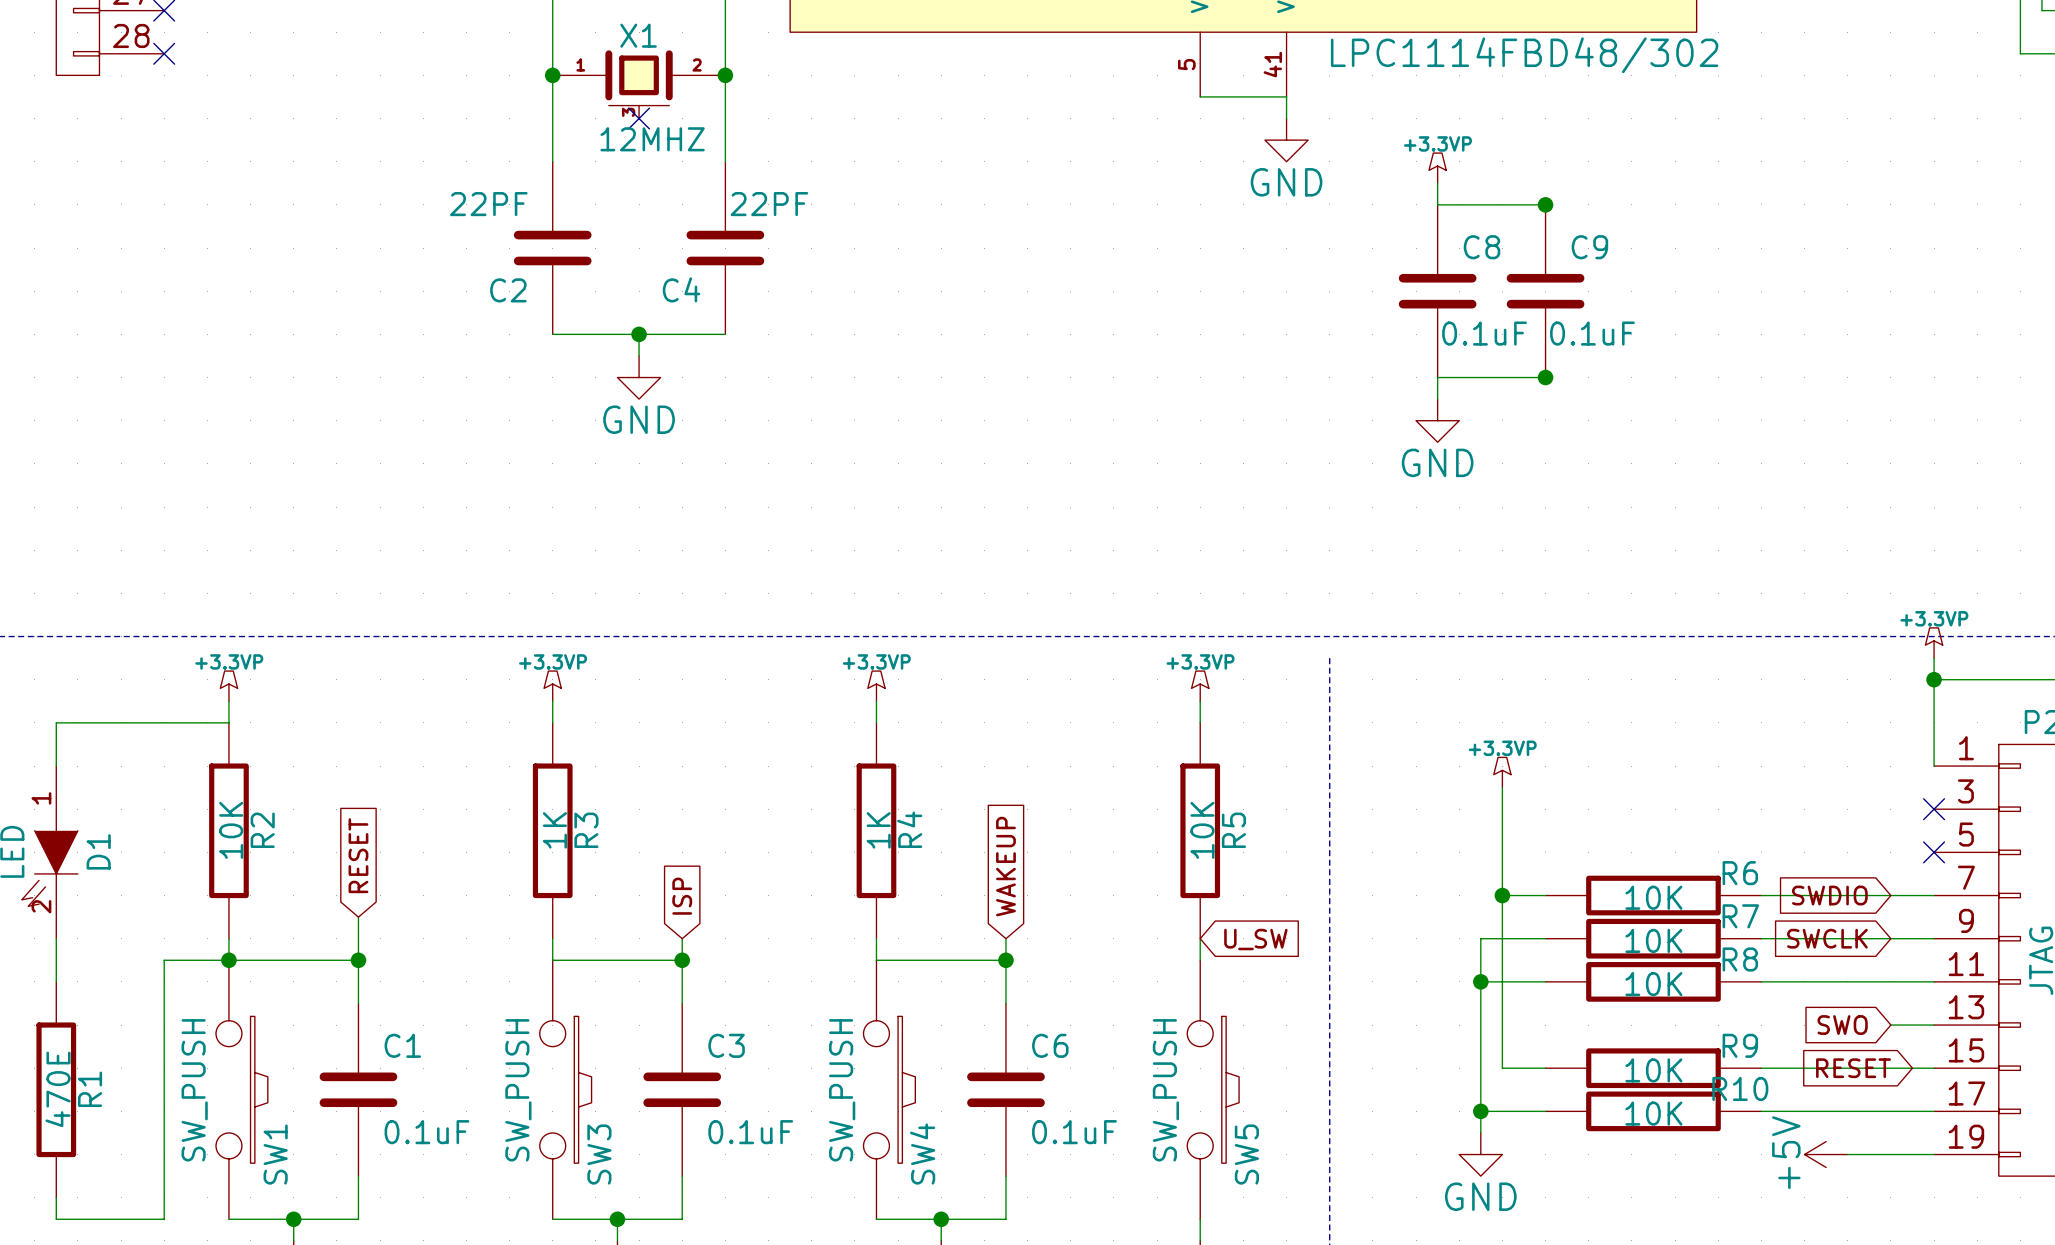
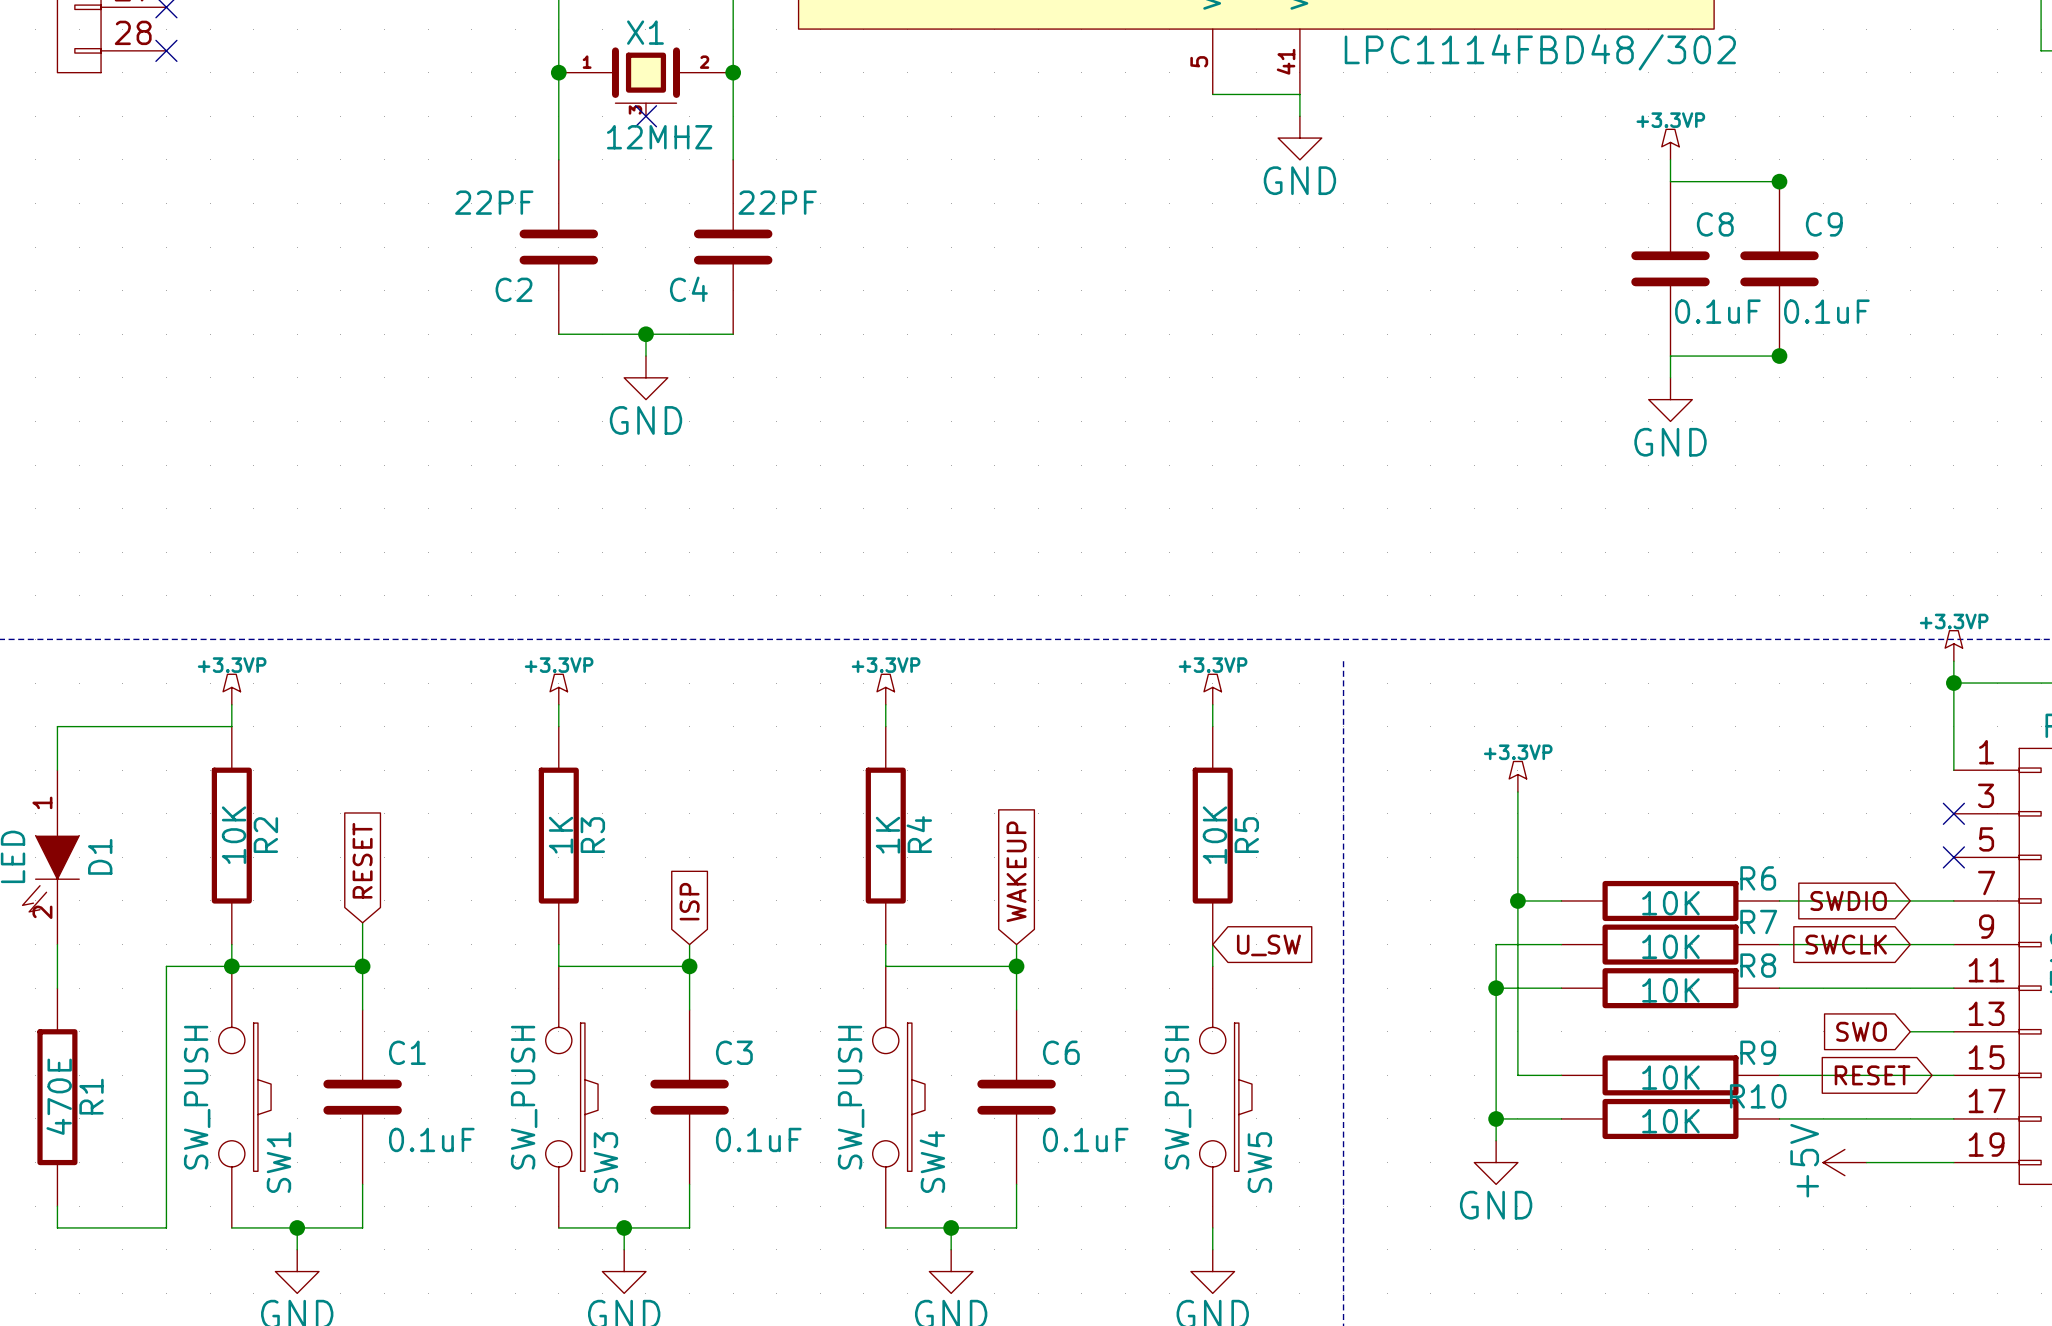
power symbol position: +3.3VP (1437, 168) -> +3.3VP (1670, 144)
wire: (1437, 183) (1437, 204) (1545, 204) -> (1670, 159) (1670, 181) (1779, 181)
junction: none -> (1779, 181)
junction: (1545, 204) -> none
C8 position: (1437, 291) -> (1670, 268)
C9 position: (1545, 291) -> (1779, 268)
junction: none -> (1779, 356)
wire: (1545, 377) (1437, 377) (1437, 399) -> (1779, 356) (1670, 356) (1670, 377)
junction: (1545, 377) -> none
power symbol position: GND (1437, 420) -> GND (1670, 399)

